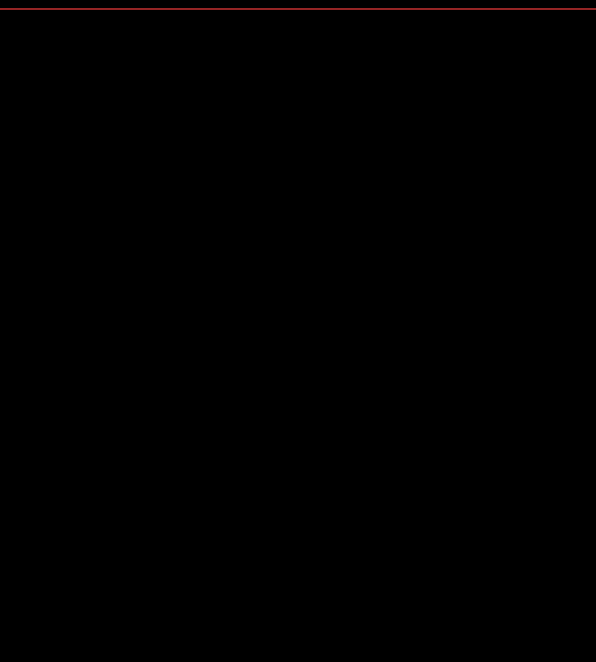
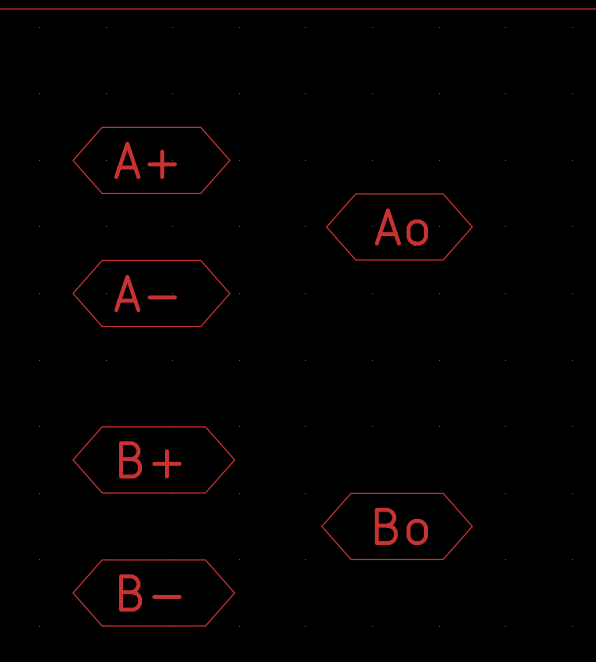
global label: none -> A+ (145, 160)
global label: none -> Ao (401, 226)
global label: none -> A- (145, 293)
global label: none -> B+ (150, 459)
global label: none -> Bo (401, 526)
global label: none -> B- (150, 592)

